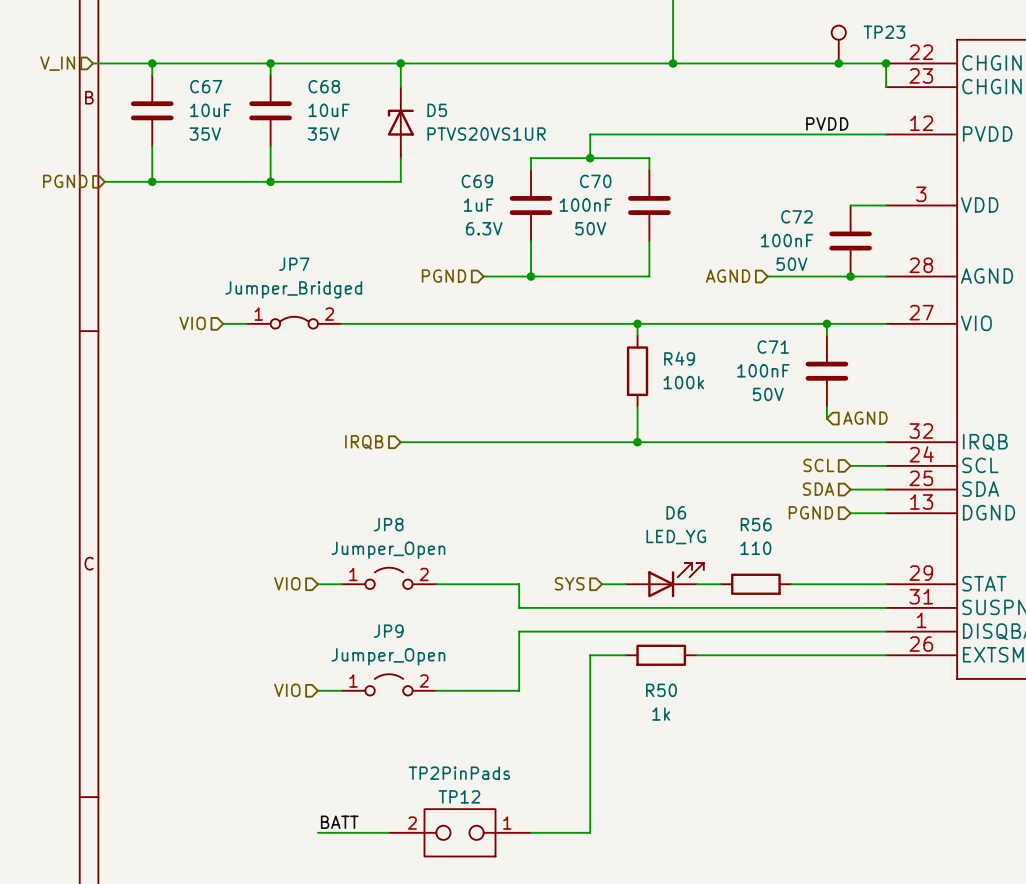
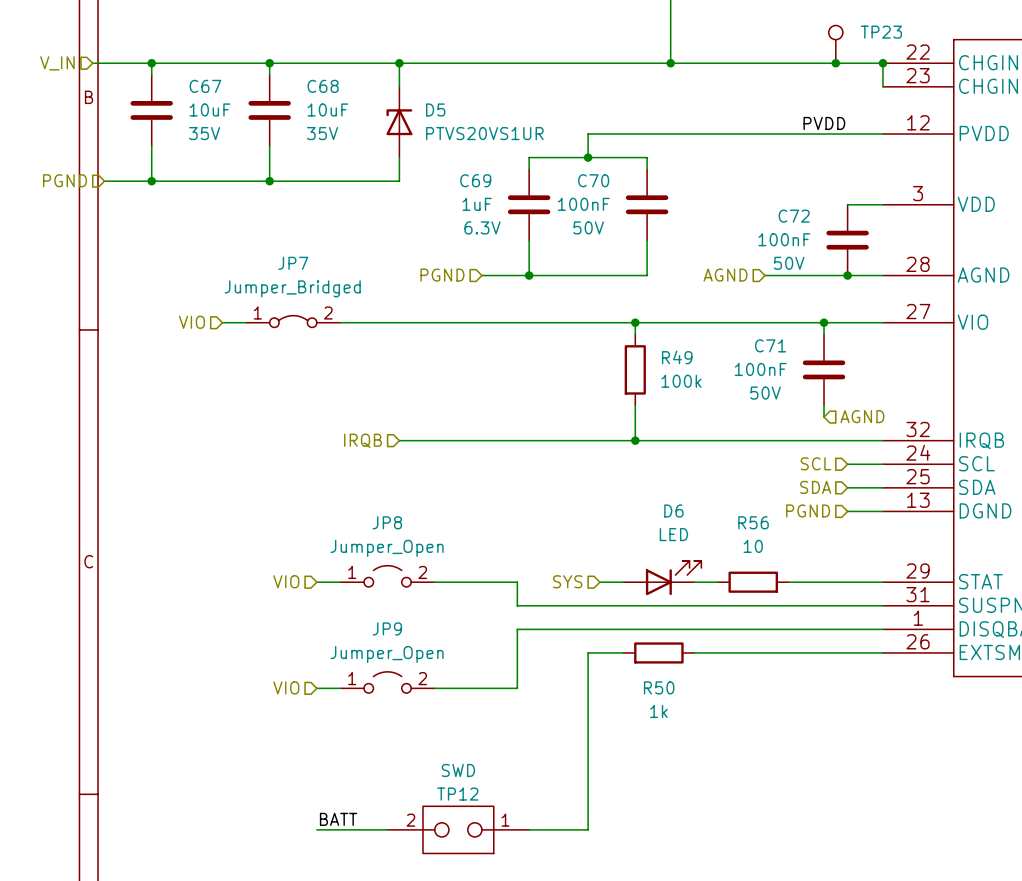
D6 value: LED_YG (676, 537) -> LED (673, 534)
R56 value: 110 (755, 548) -> 10 (753, 546)
TP12 value: TP2PinPads (459, 773) -> SWD (458, 770)

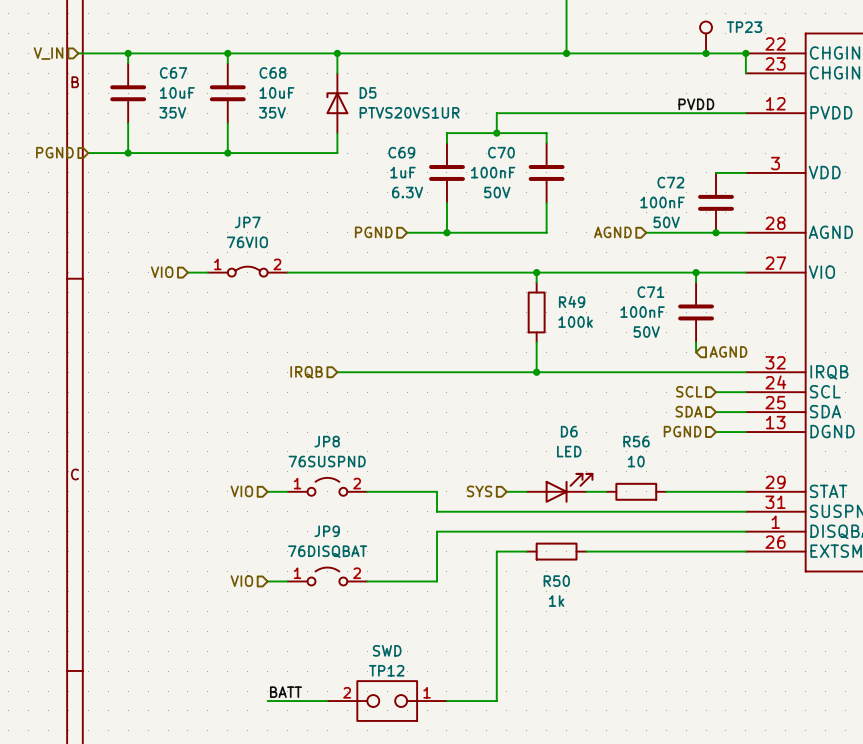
JP7 value: Jumper_Bridged (292, 288) -> 76VIO (247, 242)
JP8 value: Jumper_Open (387, 548) -> 76SUSPND (327, 461)
JP9 value: Jumper_Open (387, 654) -> 76DISQBAT (327, 551)

